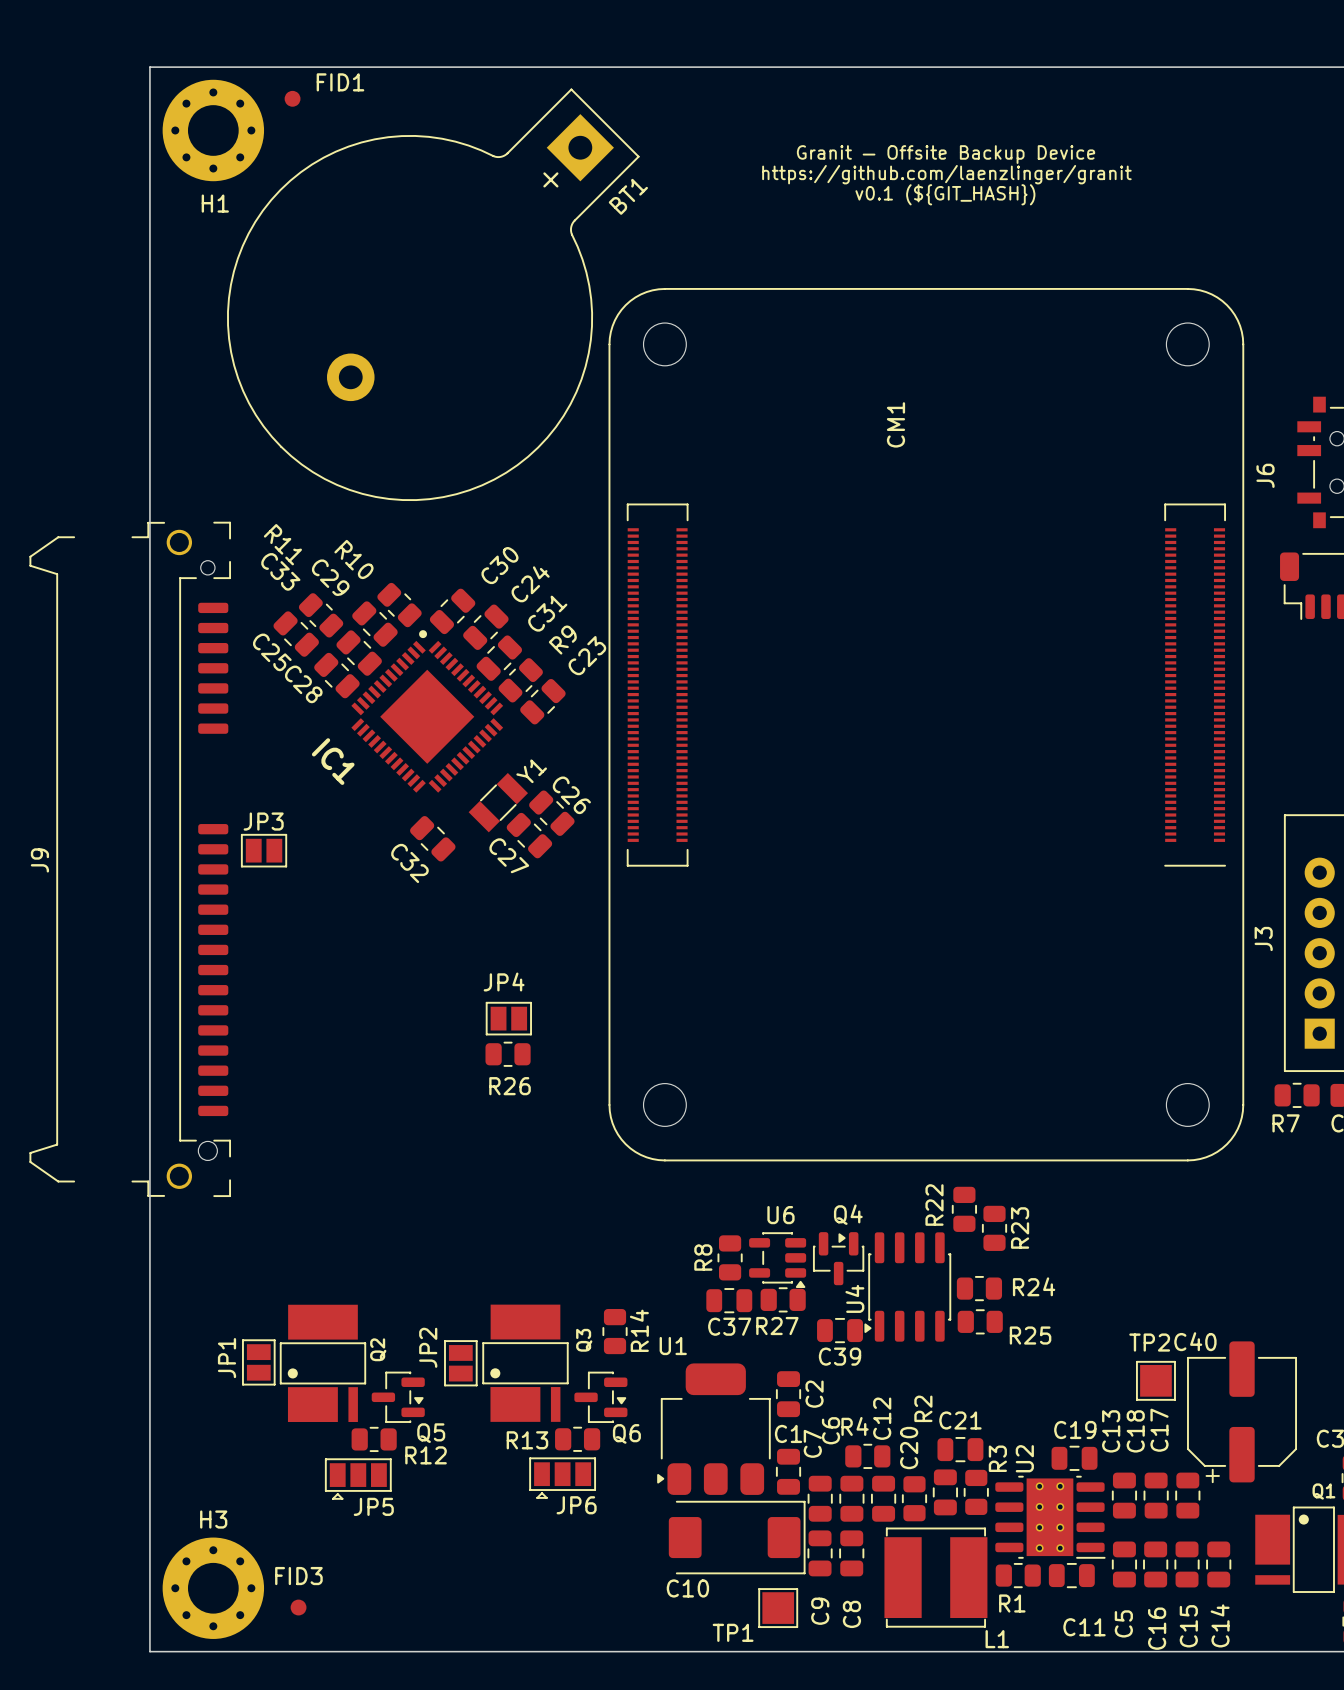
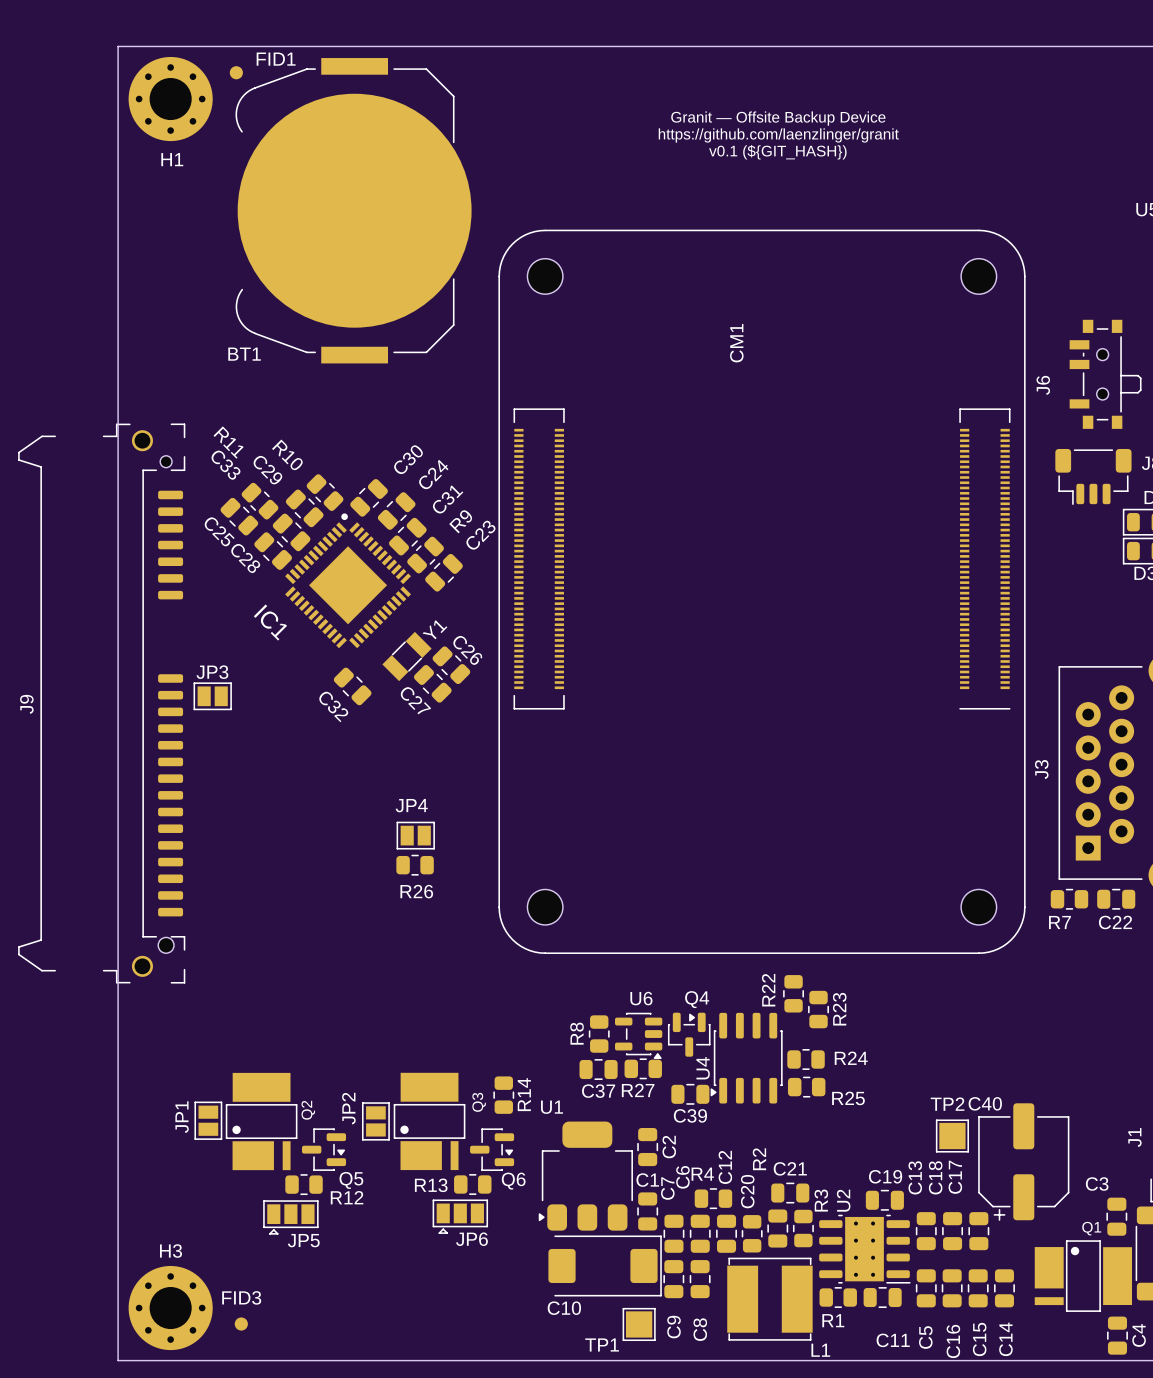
BT1 footprint: [227, 88, 640, 502] -> [235, 58, 472, 364]
BT1 name position: BT1 (628, 196) -> BT1 (244, 354)

